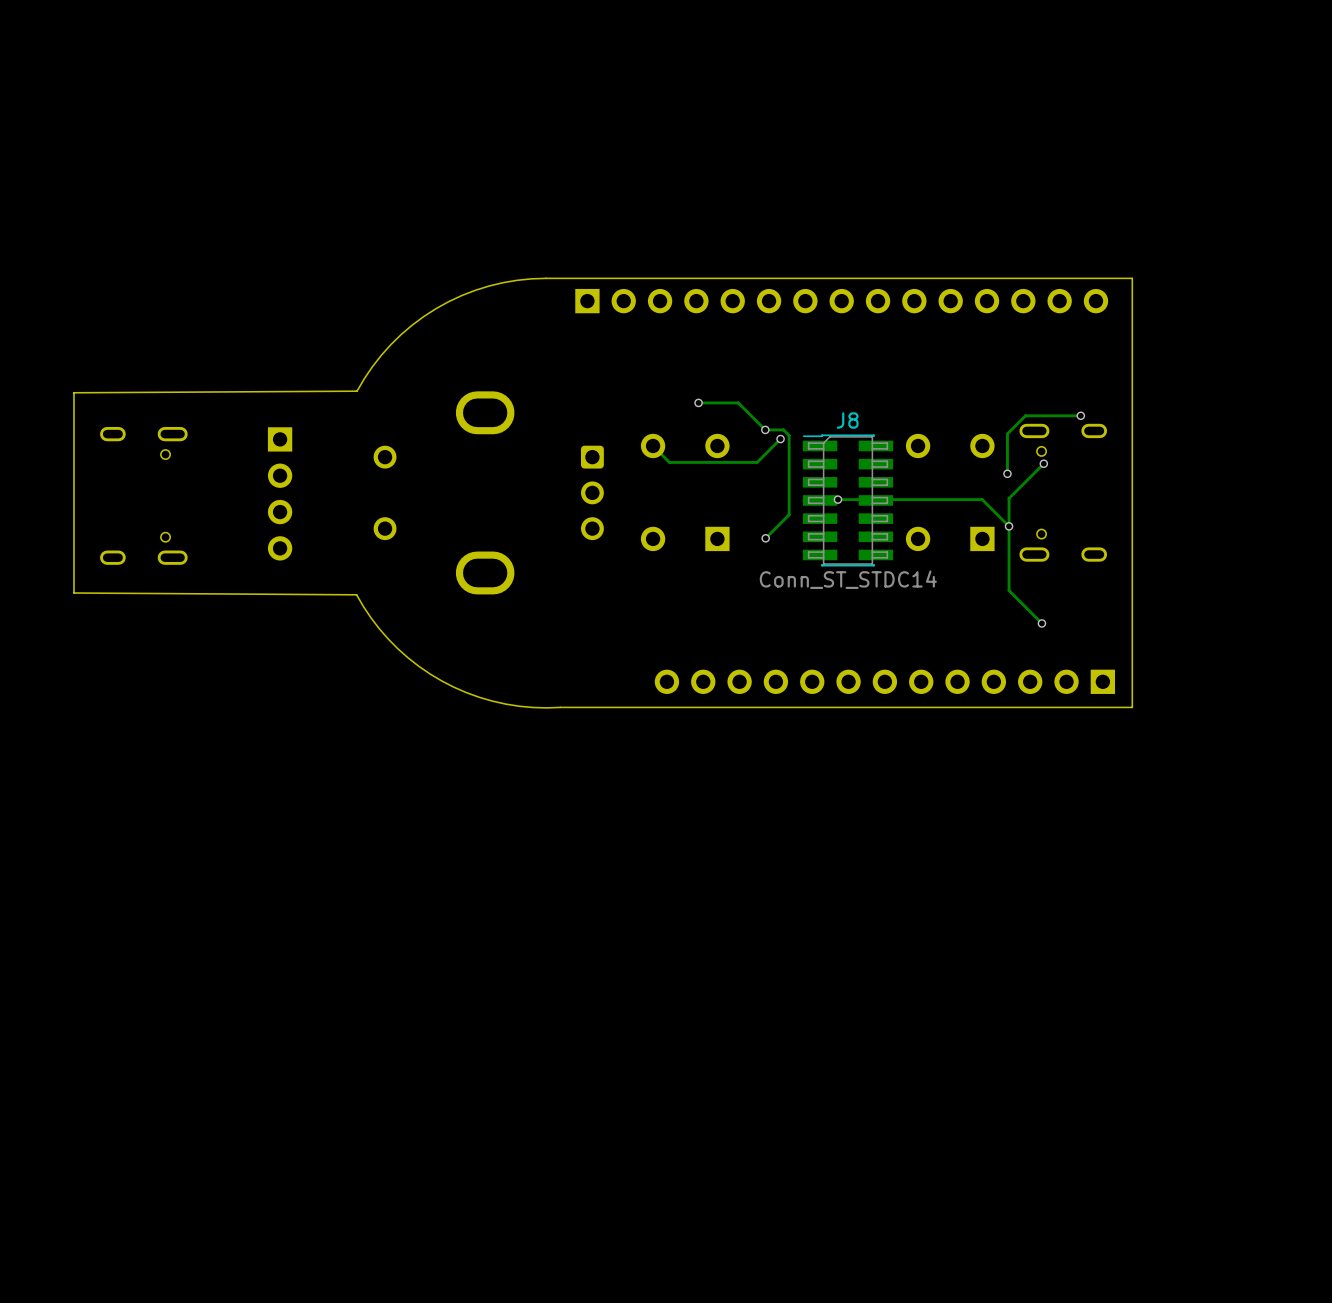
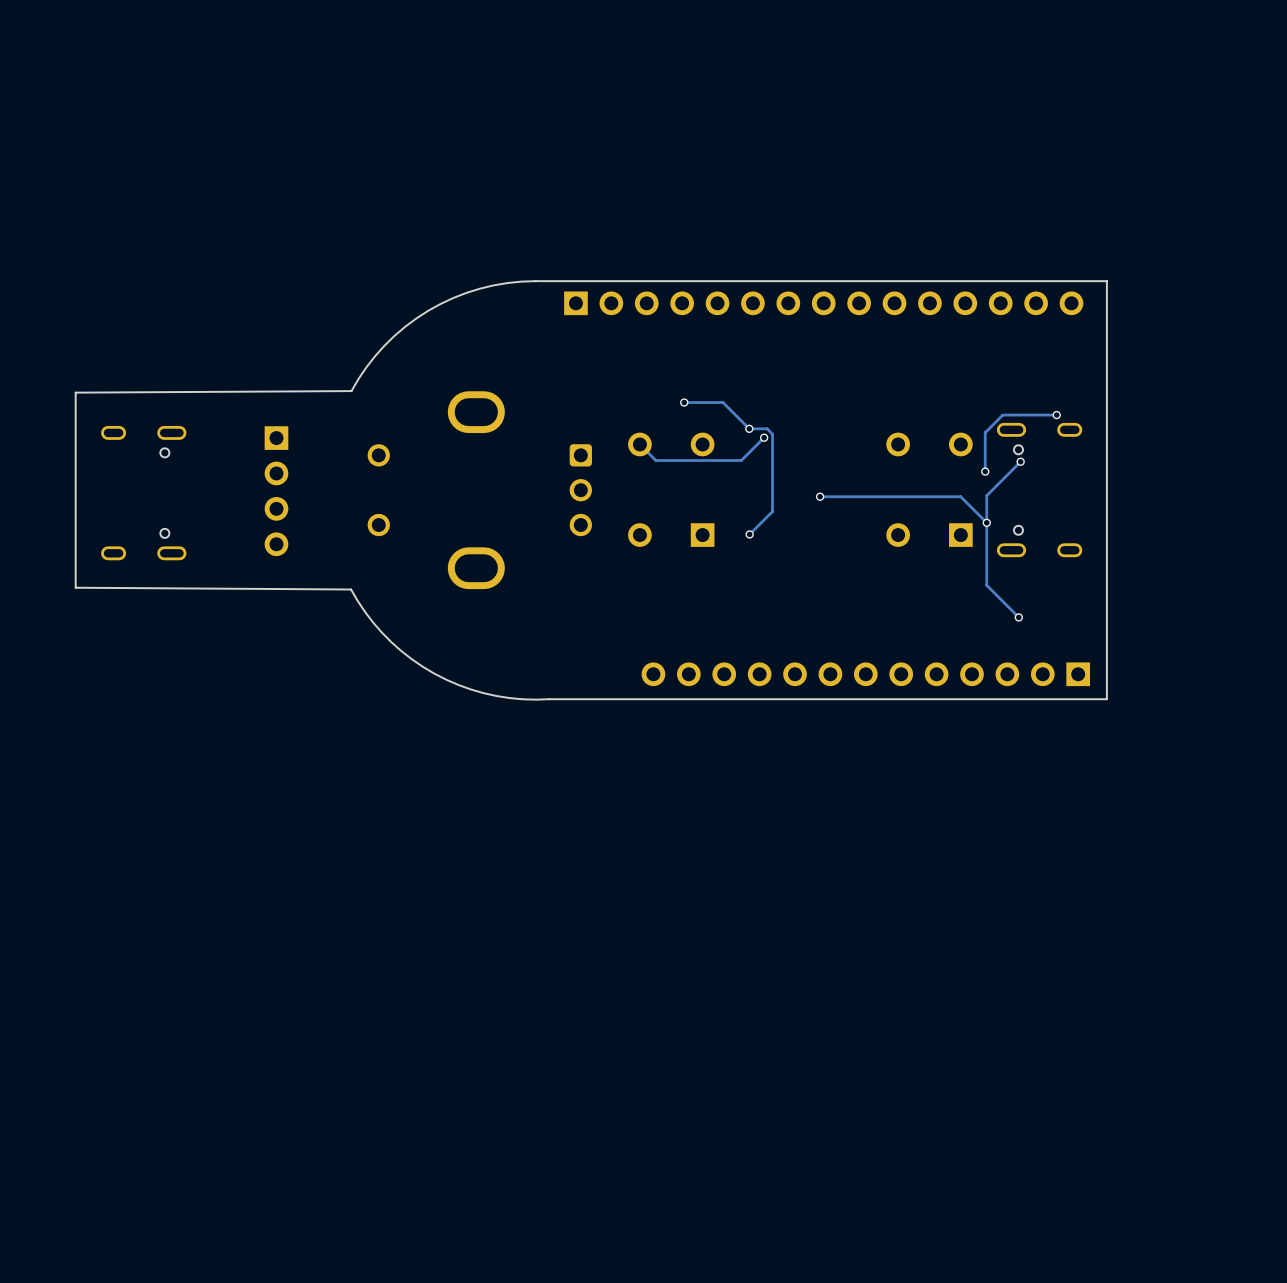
J8: Conn_ST_STDC14 (847, 500) -> none

